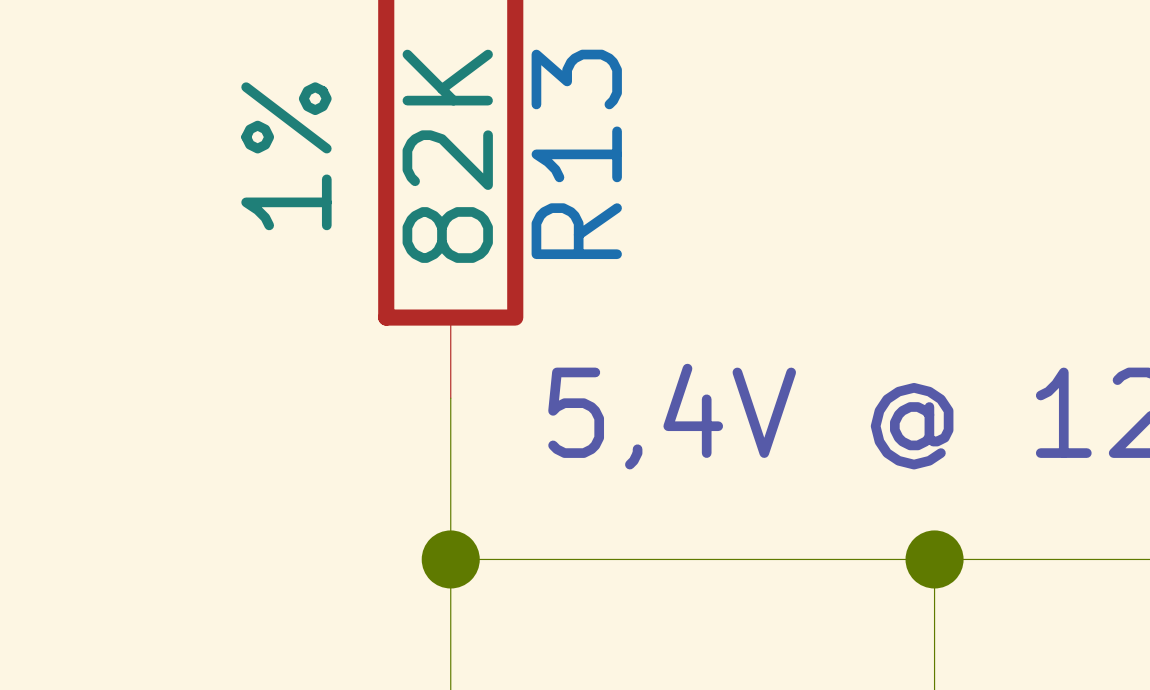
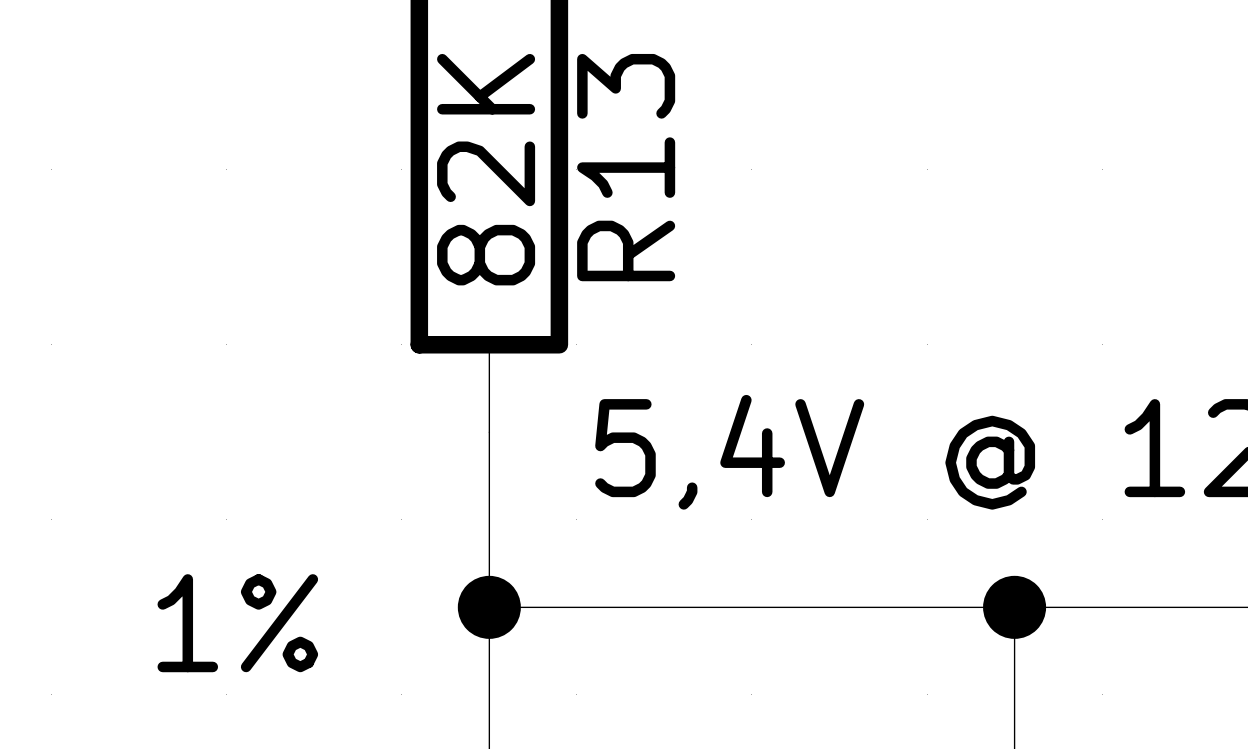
R13 text: 1% (286, 156) -> none
text: none -> 1% (237, 623)

